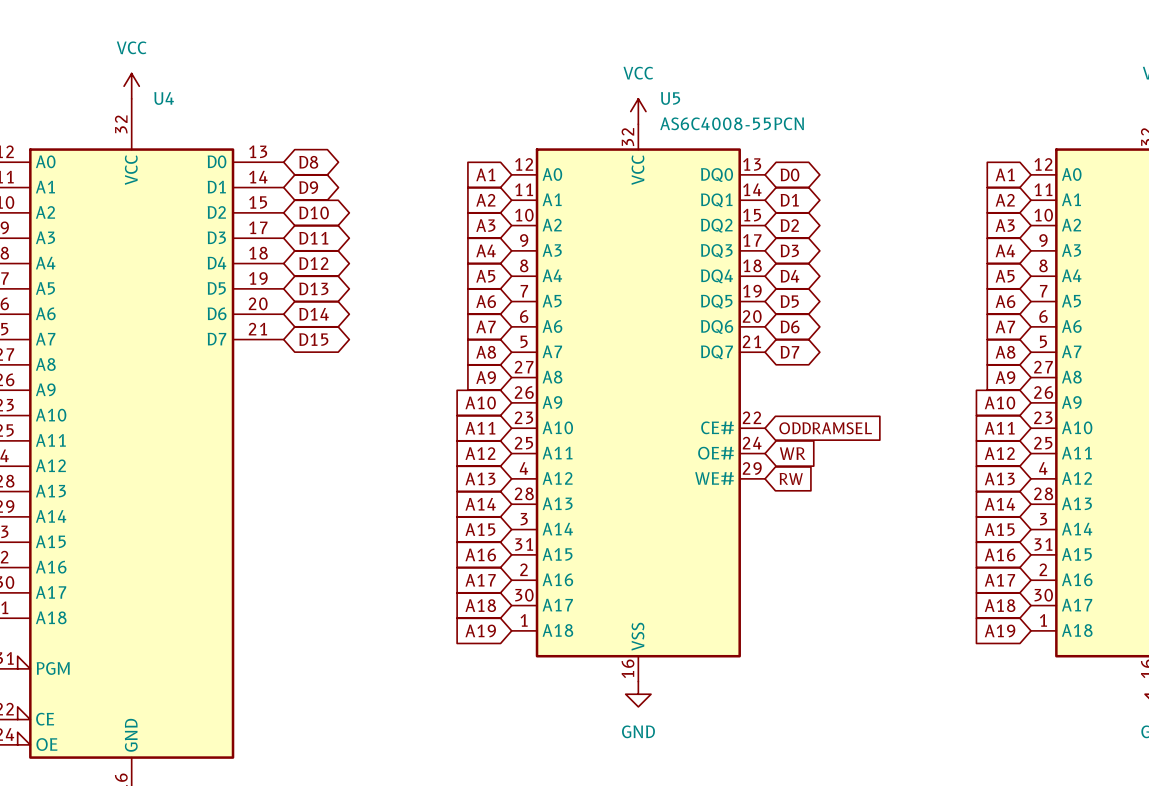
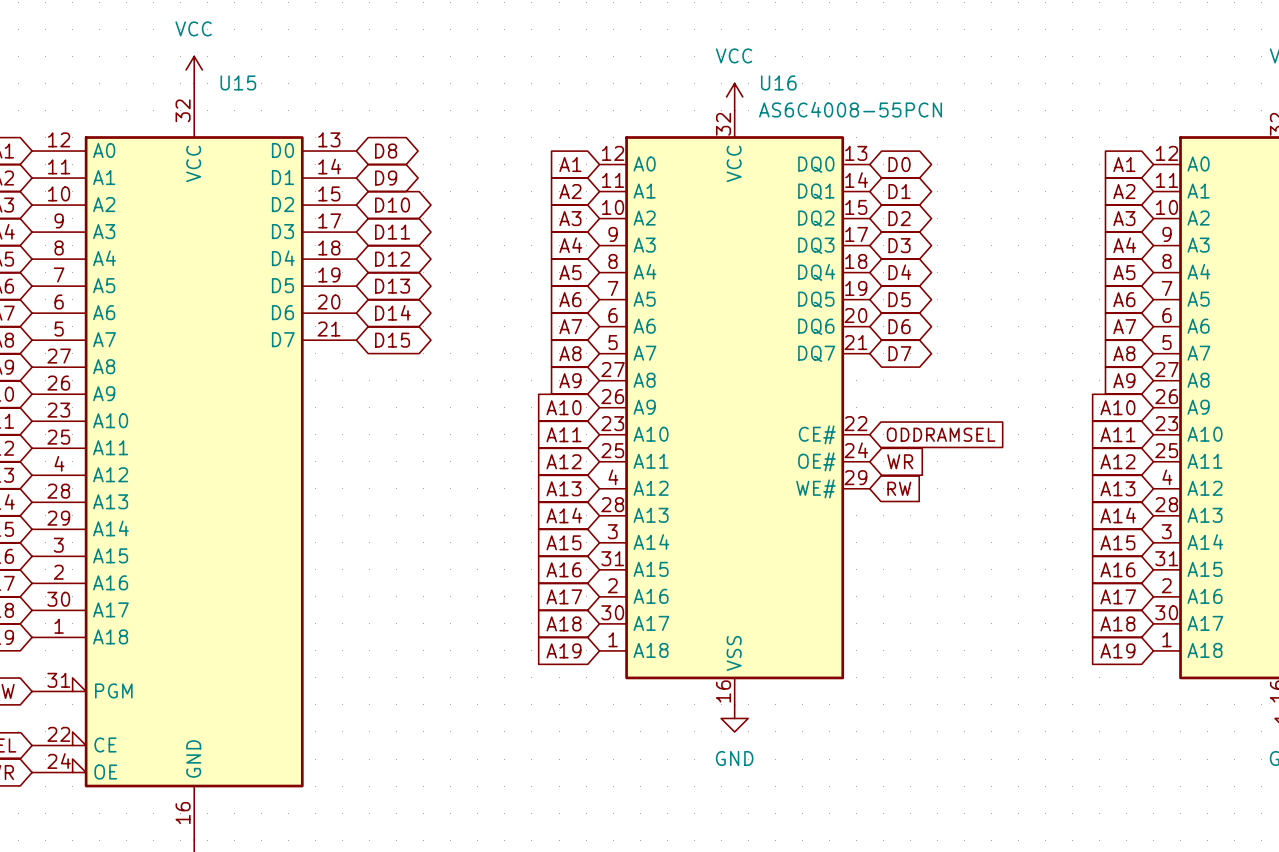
U4 name: U4 (164, 98) -> U15 (238, 82)
U5 name: U5 (670, 98) -> U16 (778, 82)

